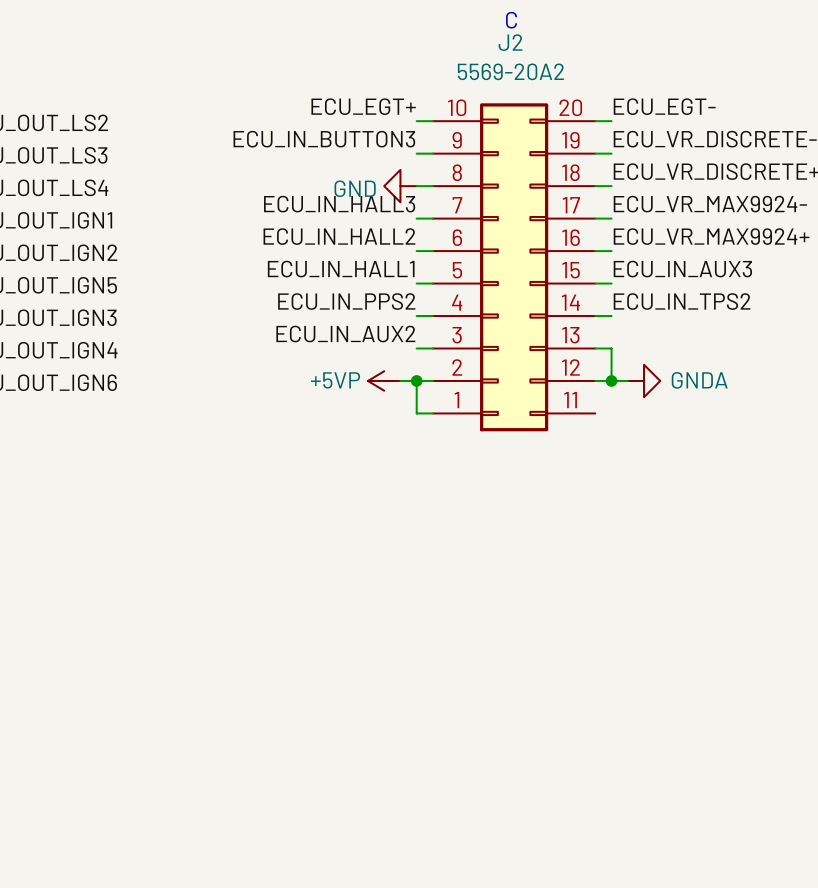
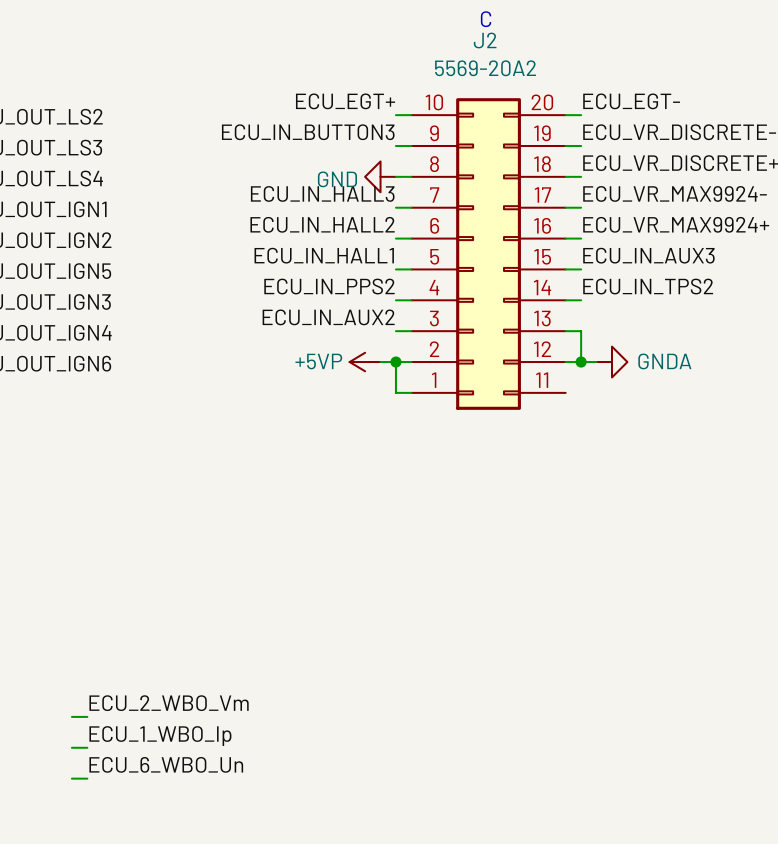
label: none -> ECU_2_WBO_Vm (169, 703)
wire: none -> (71, 716) (87, 716)
label: none -> ECU_1_WBO_Ip (160, 736)
wire: none -> (71, 747) (87, 747)
label: none -> ECU_6_WBO_Un (166, 764)
wire: none -> (71, 778) (87, 778)

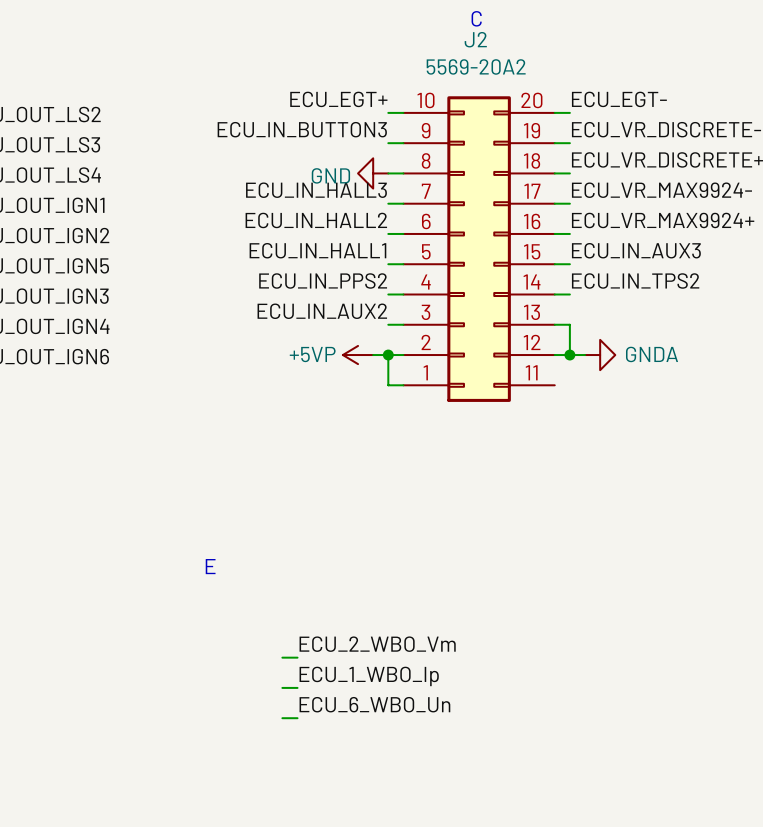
text: none -> E (210, 566)
label position: ECU_2_WBO_Vm (169, 703) -> ECU_2_WBO_Vm (377, 644)
wire: (71, 716) (87, 716) -> (282, 657) (297, 657)
label position: ECU_1_WBO_Ip (160, 736) -> ECU_1_WBO_Ip (369, 676)
wire: (71, 747) (87, 747) -> (282, 687) (297, 687)
label position: ECU_6_WBO_Un (166, 764) -> ECU_6_WBO_Un (374, 704)
wire: (71, 778) (87, 778) -> (282, 718) (297, 718)

